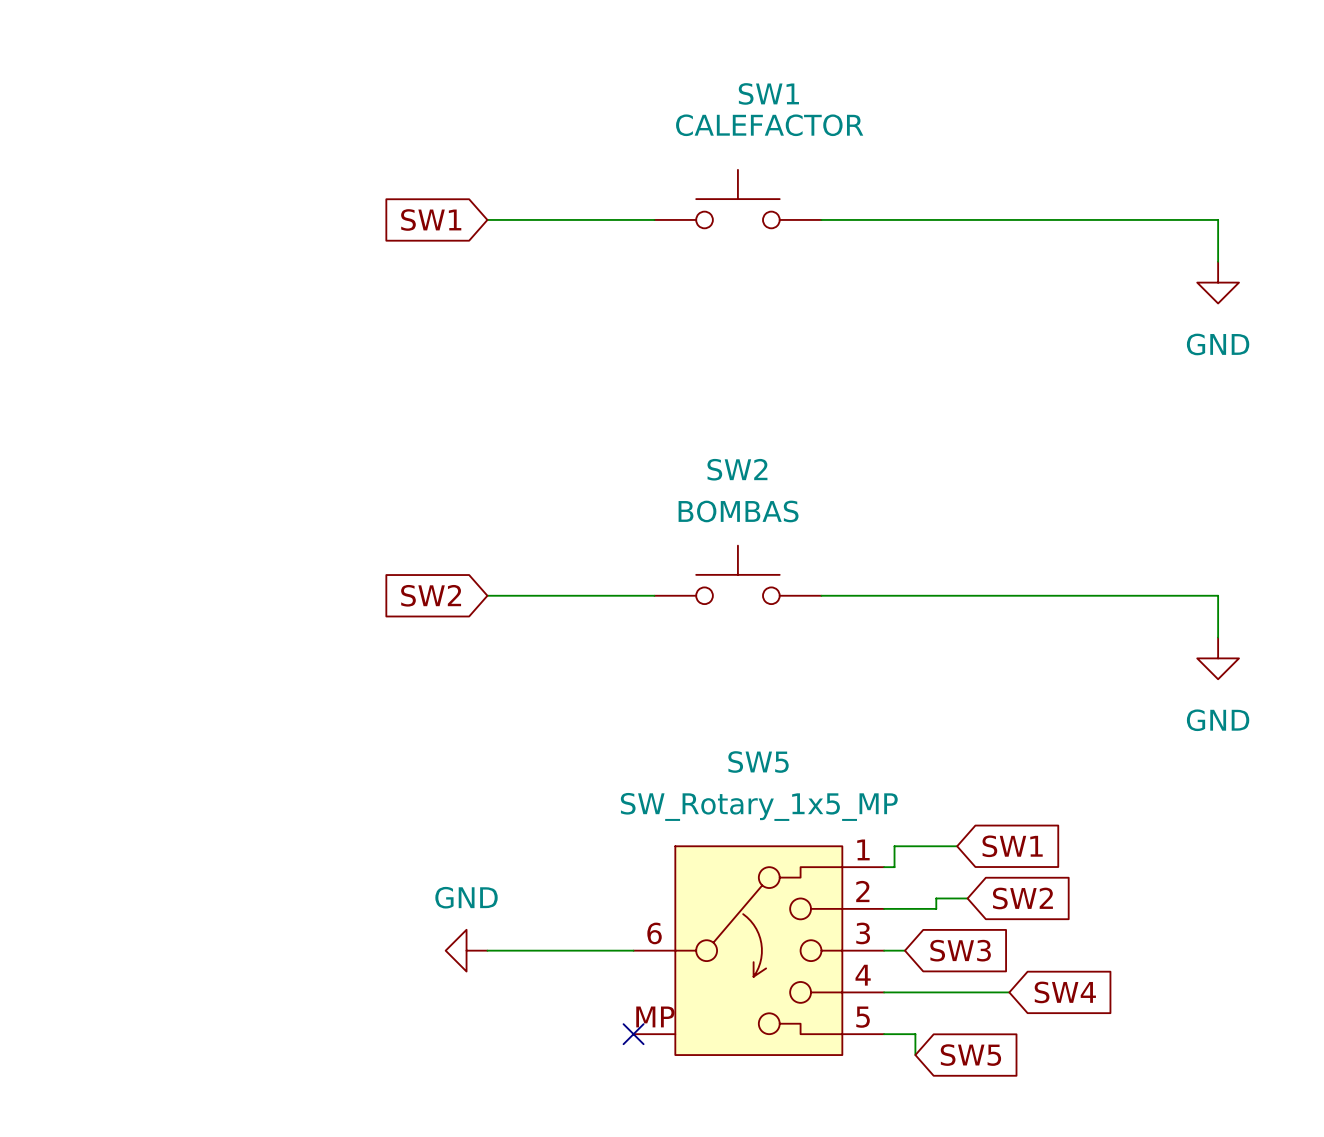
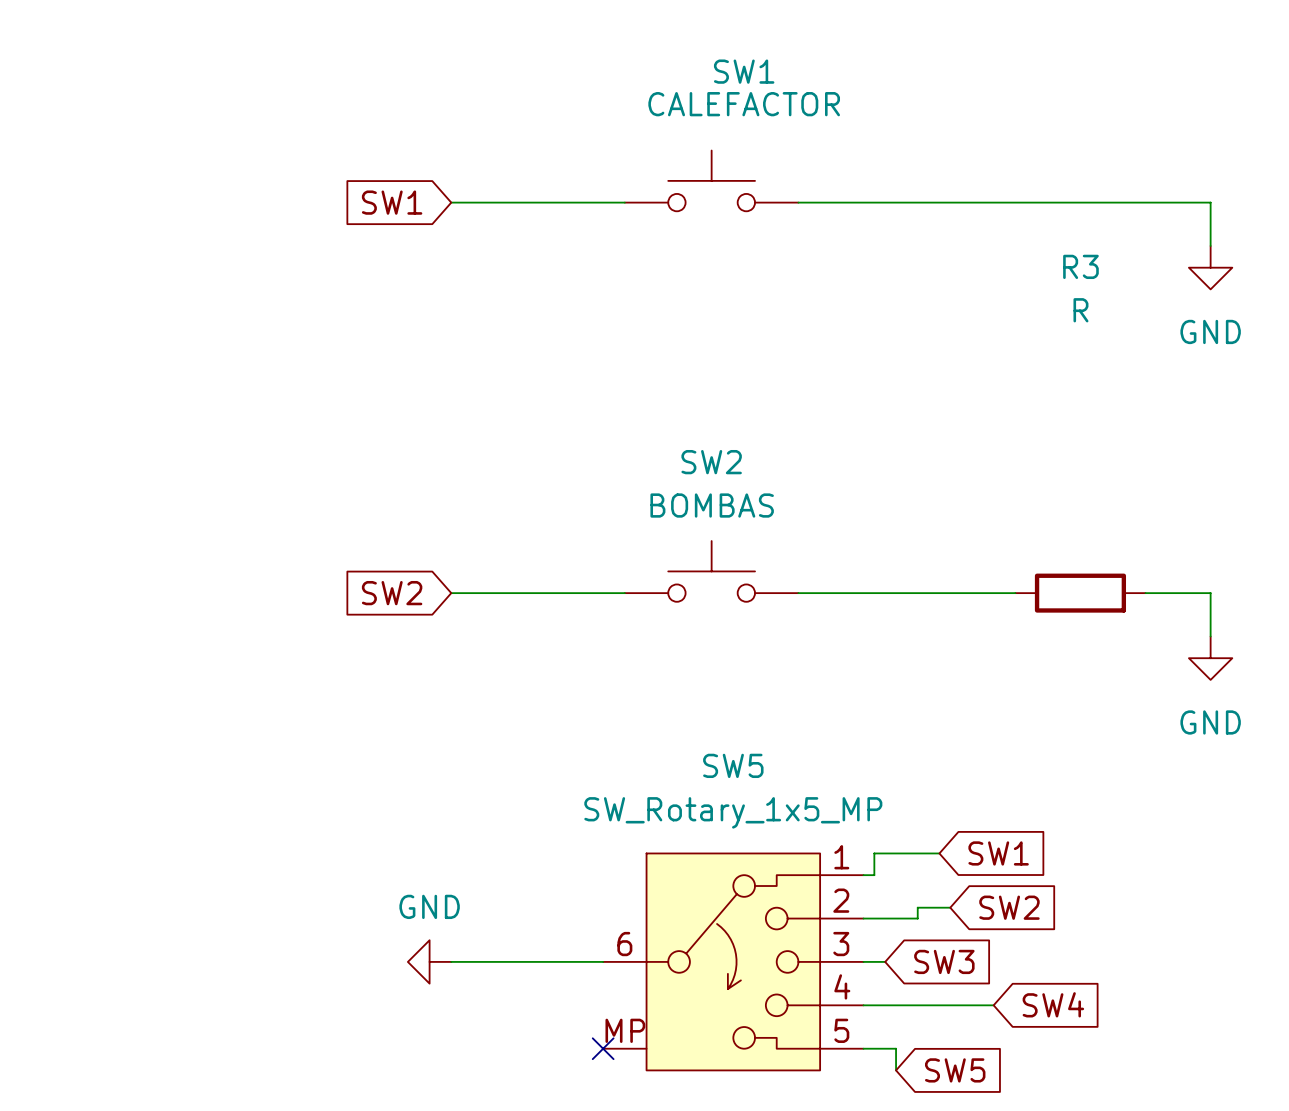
wire: (1030, 595) (1155, 595) -> none
R3: none -> R (1080, 593)

